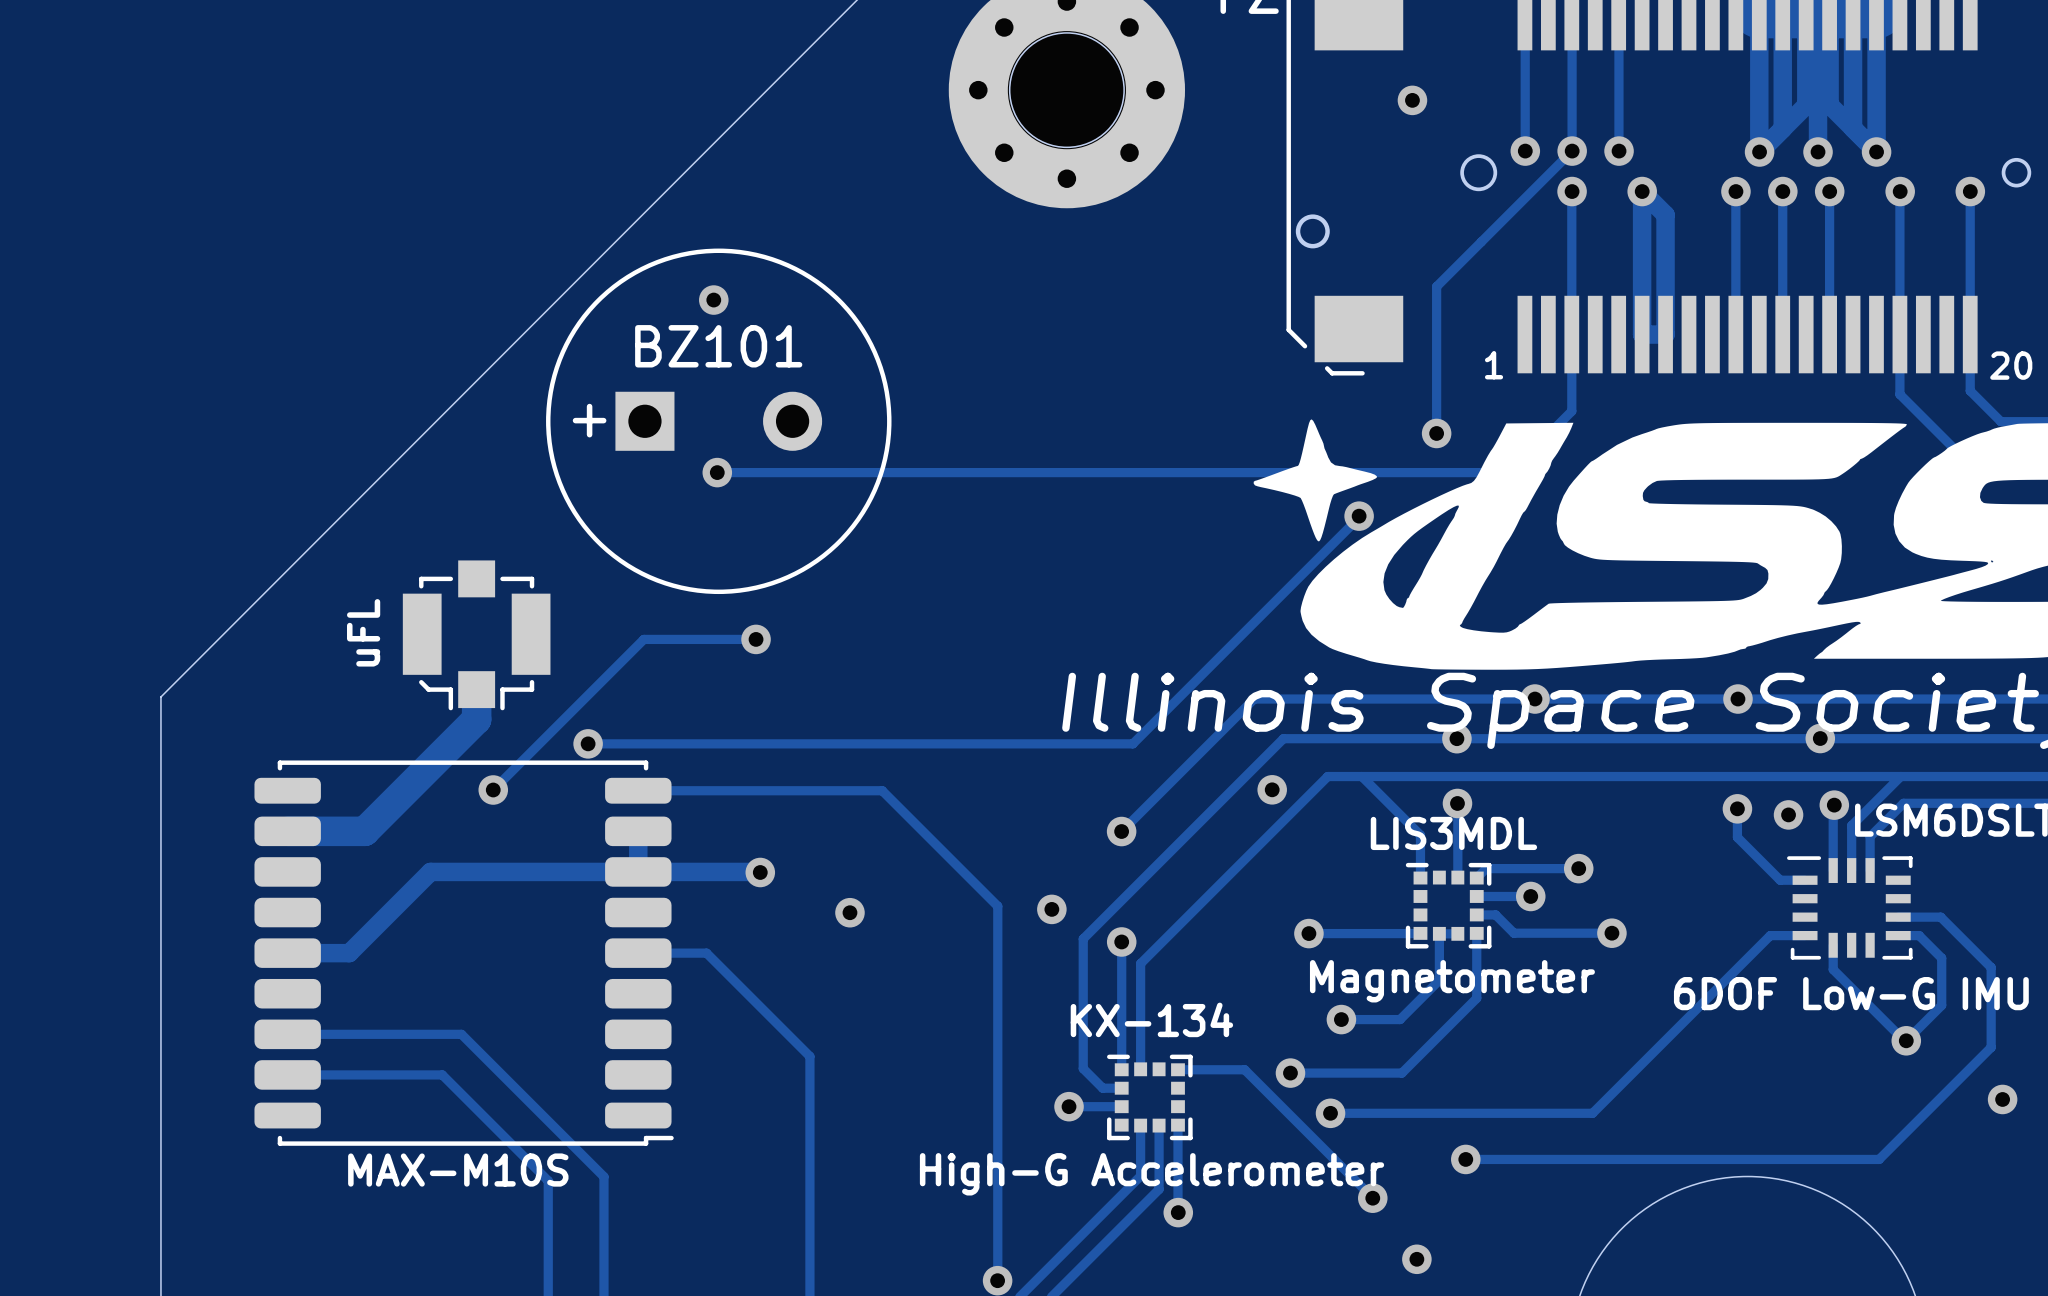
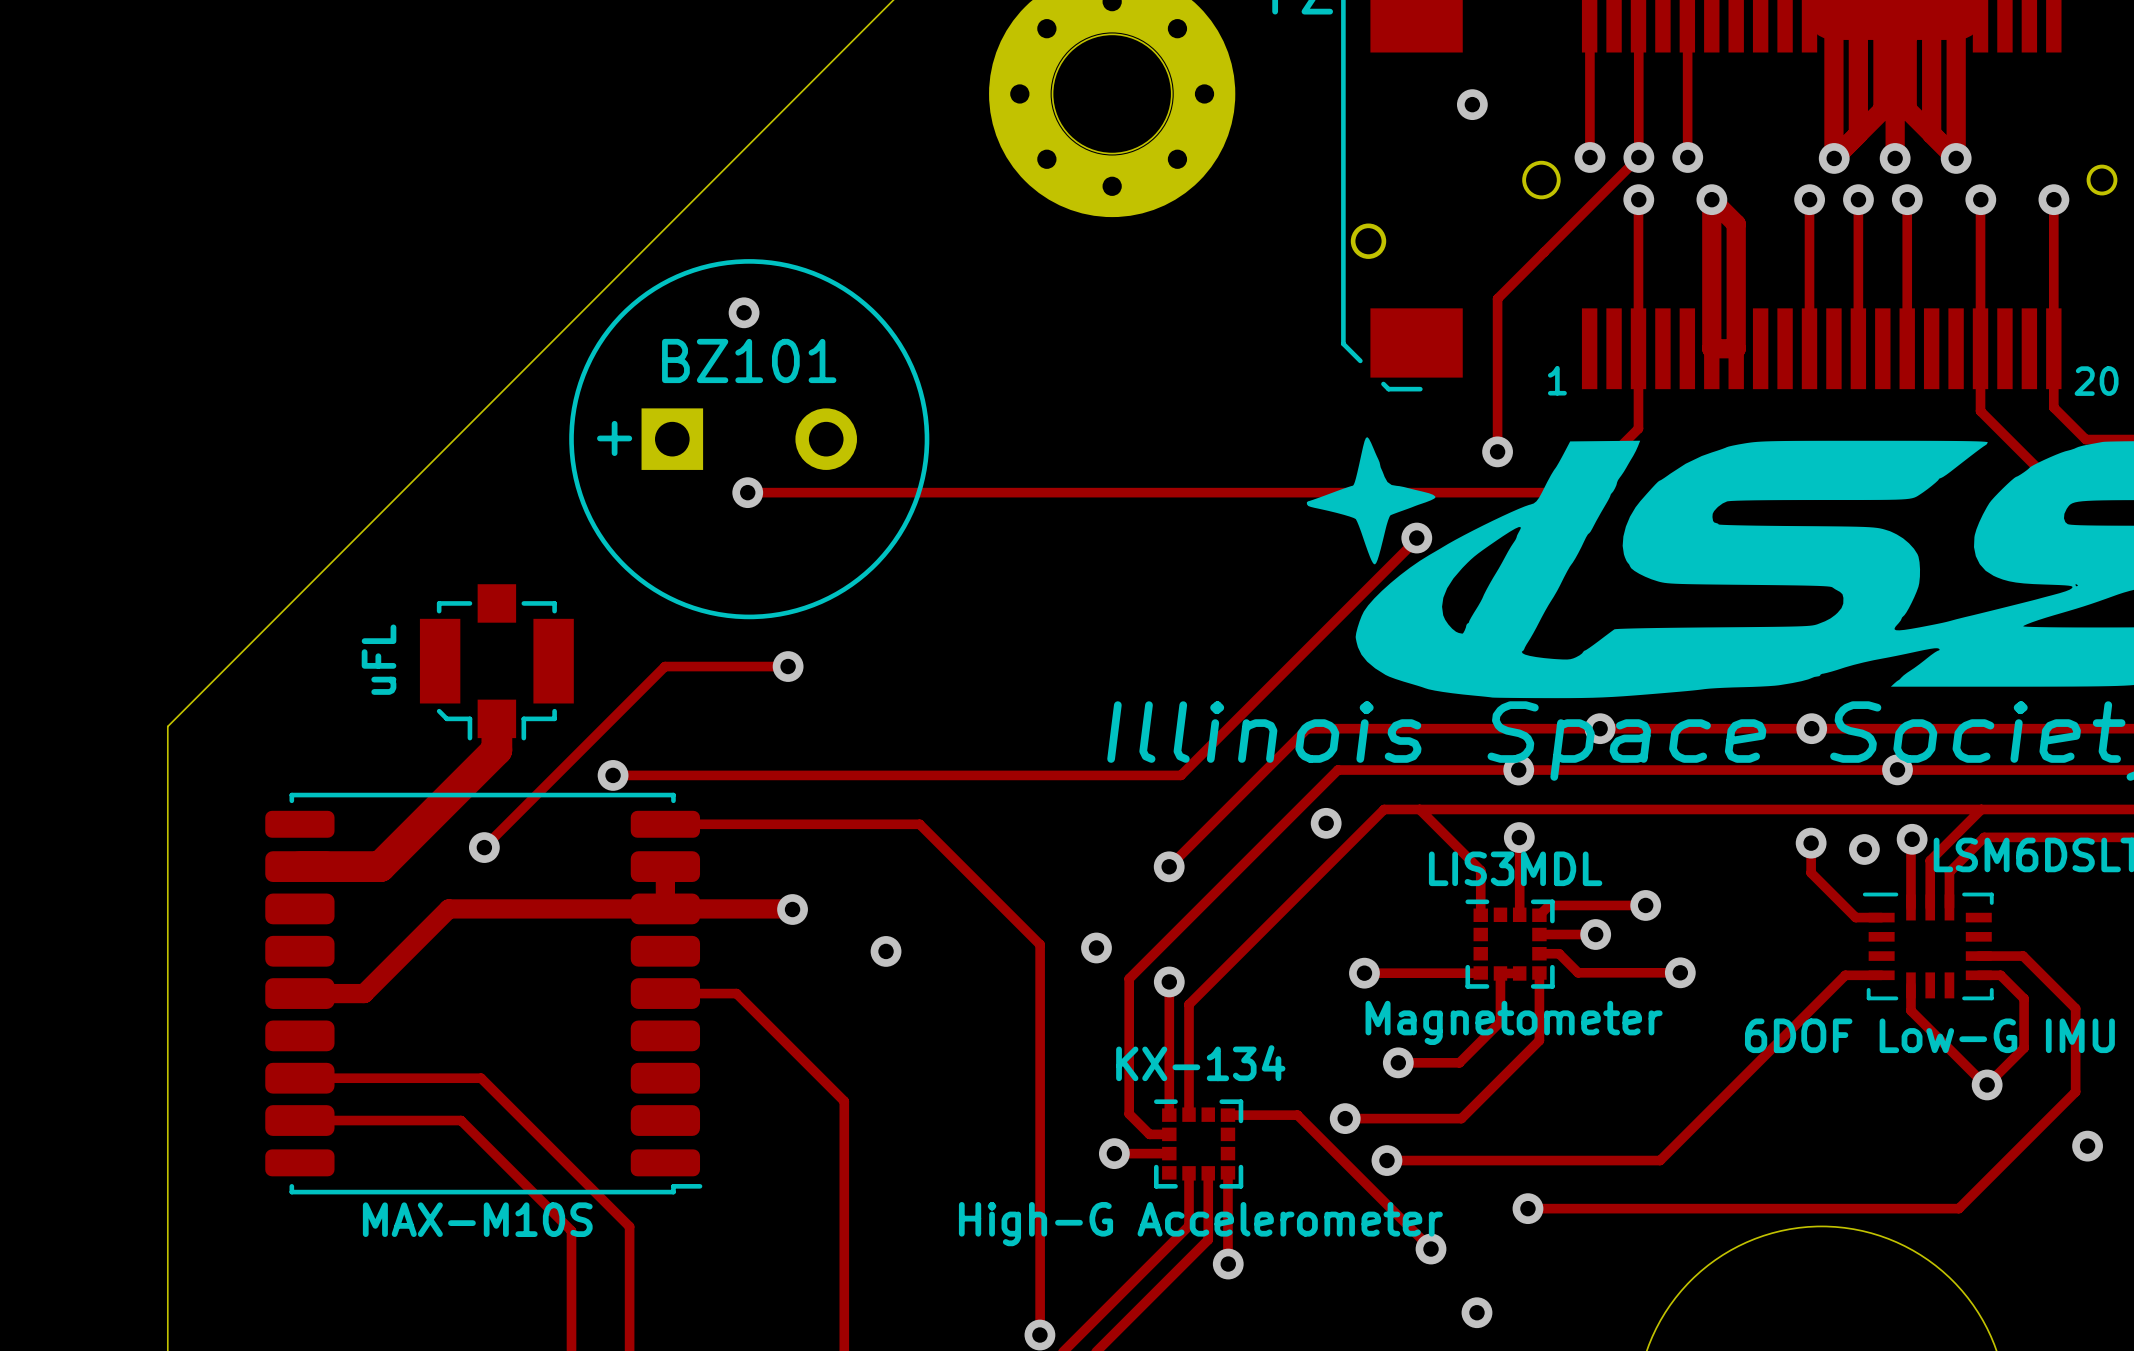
track: (643, 639) (493, 790) -> (671, 666) (665, 666) (484, 847)
via position: (493, 790) -> (484, 847)

